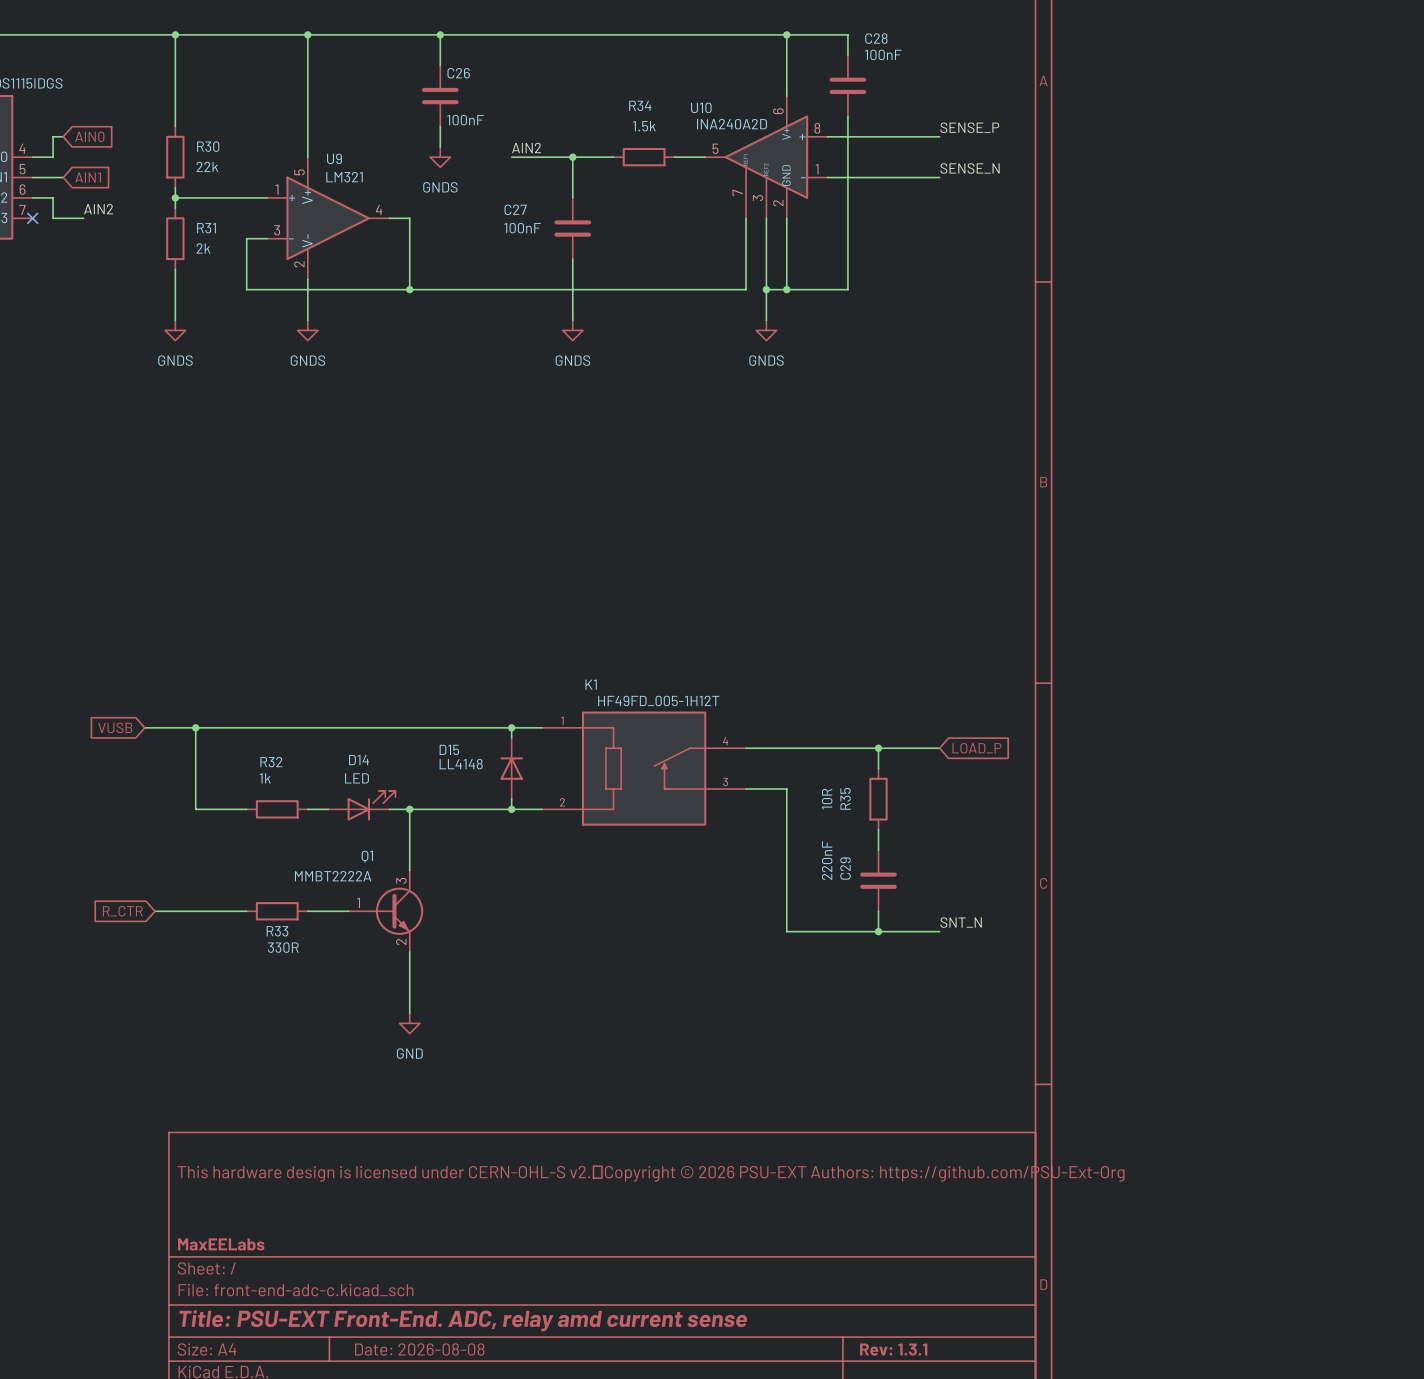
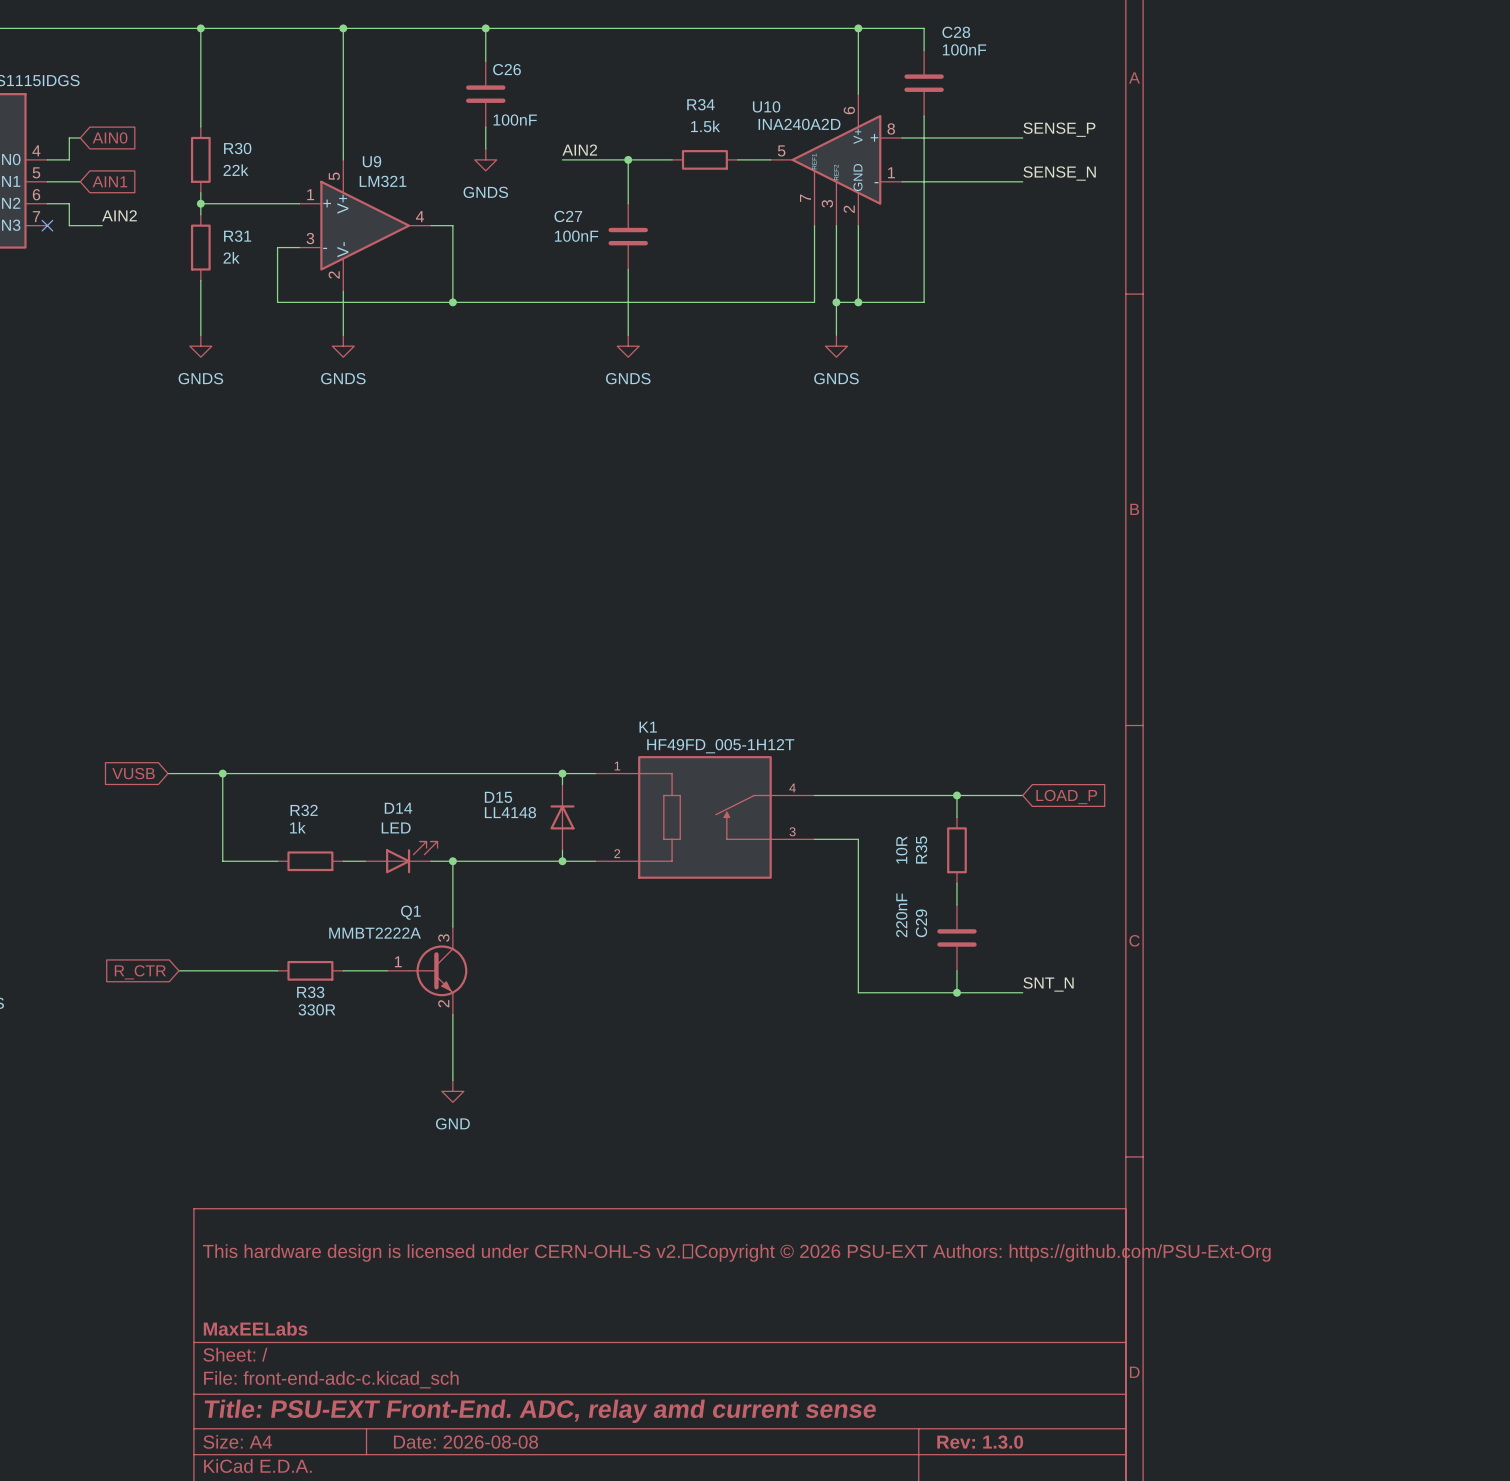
title block: Rev: 1.3.1 (893, 1349) -> Rev: 1.3.0 (980, 1442)

